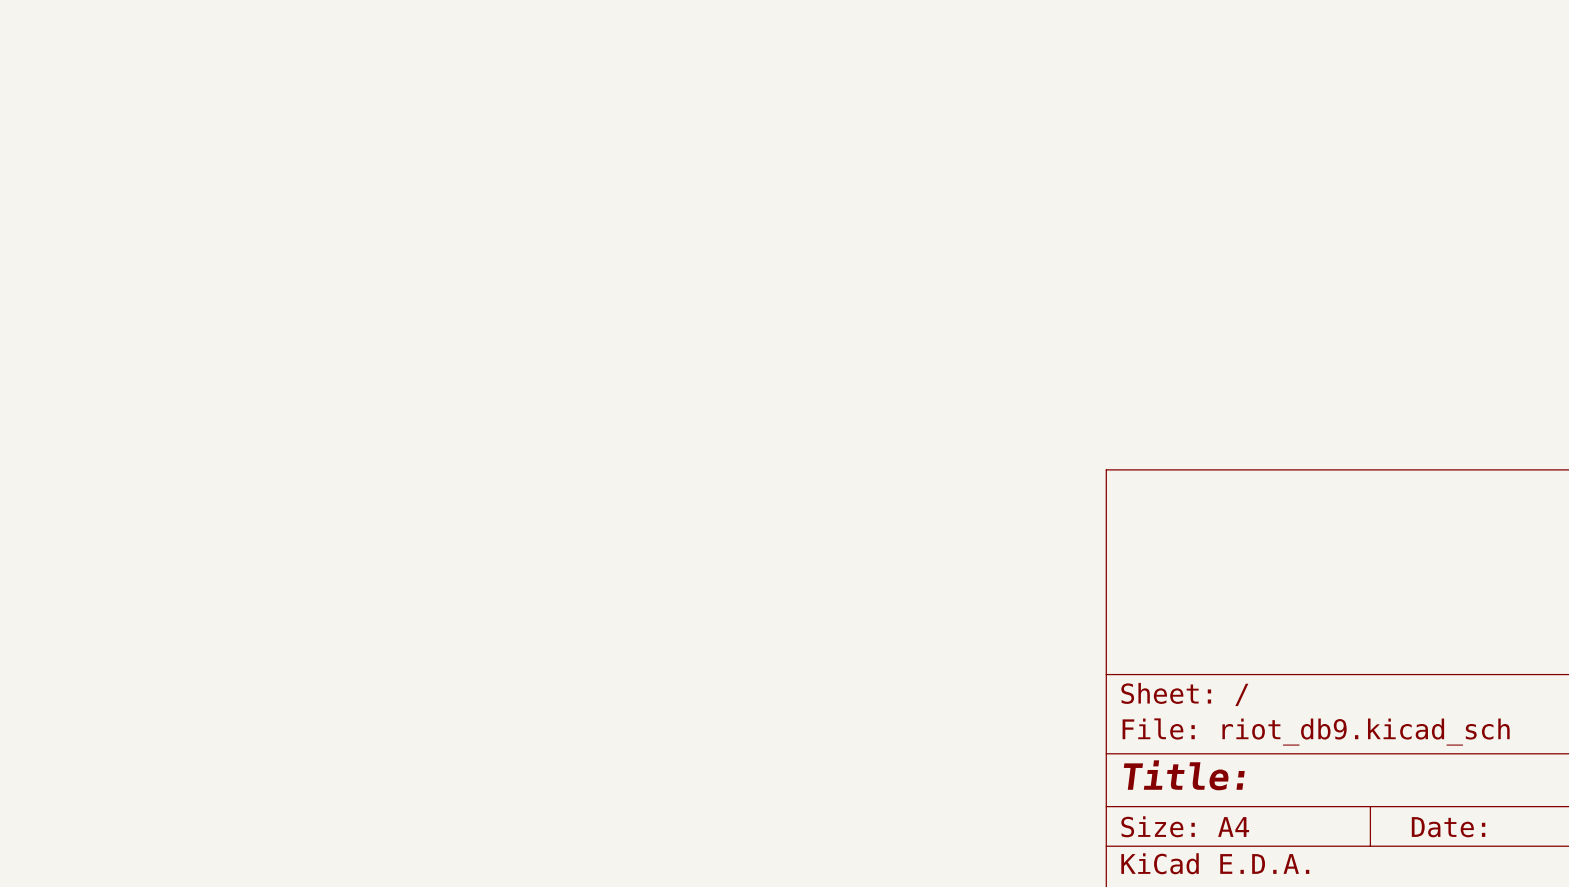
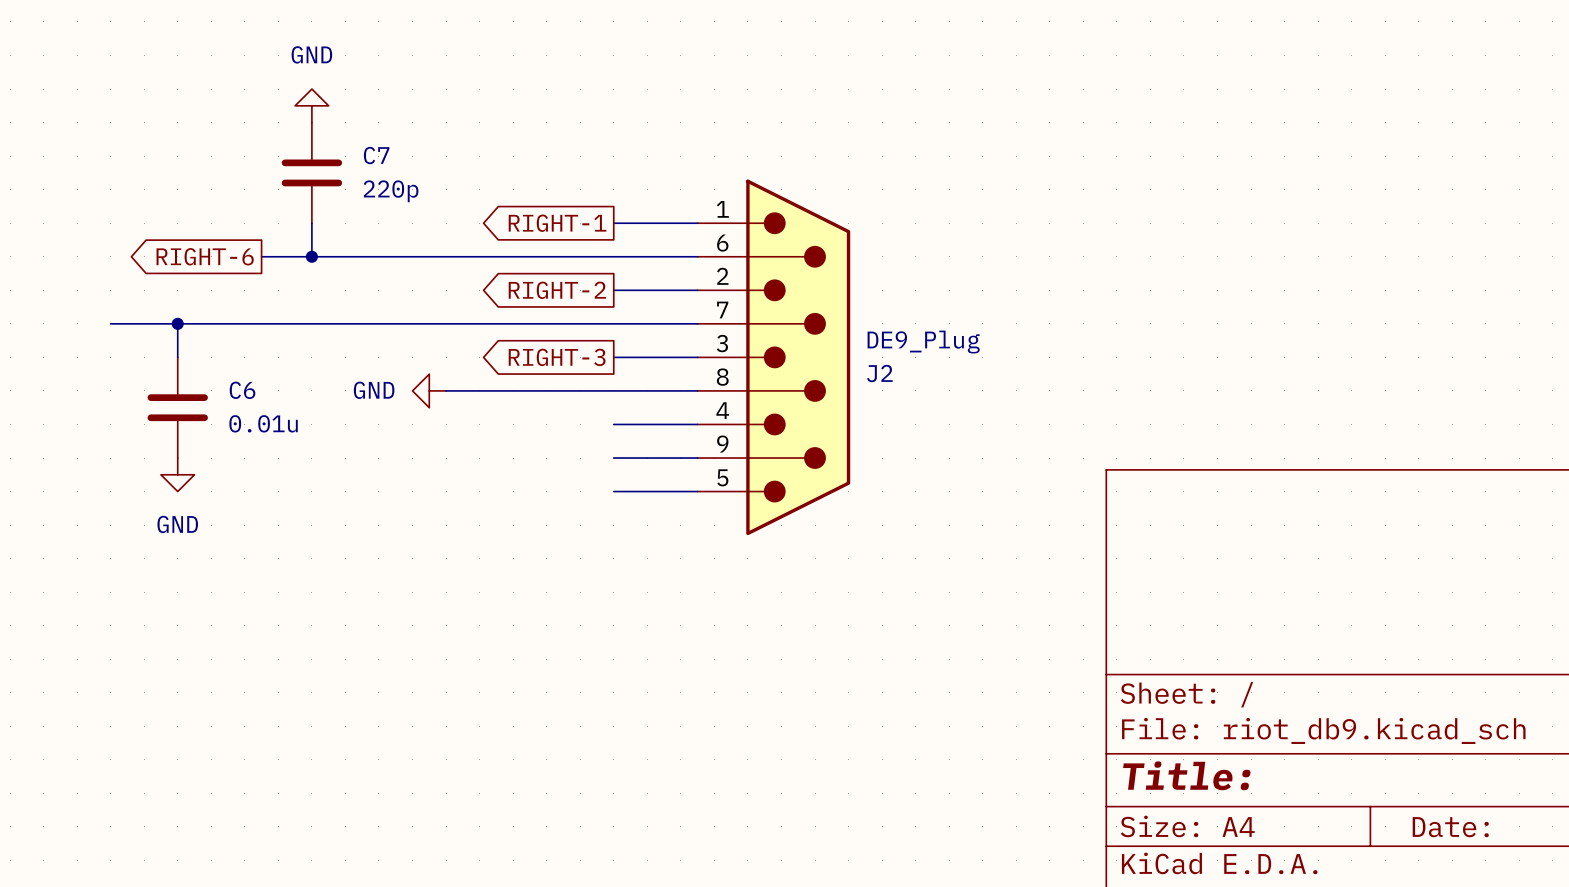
power symbol: none -> GND (311, 105)
C7: none -> 220p (311, 172)
wire: none -> (311, 223) (311, 256)
global label: none -> RIGHT-1 (557, 223)
wire: none -> (613, 223) (697, 223)
global label: none -> RIGHT-6 (205, 256)
wire: none -> (261, 256) (697, 256)
junction: none -> (311, 256)
global label: none -> RIGHT-2 (557, 290)
wire: none -> (613, 290) (697, 290)
wire: none -> (110, 323) (697, 323)
wire: none -> (177, 323) (177, 357)
junction: none -> (177, 323)
global label: none -> RIGHT-3 (557, 357)
wire: none -> (613, 357) (697, 357)
J2: none -> DE9_Plug (773, 357)
power symbol: none -> GND (429, 390)
wire: none -> (446, 390) (697, 390)
C6: none -> 0.01u (177, 407)
wire: none -> (613, 424) (697, 424)
wire: none -> (613, 458) (697, 458)
power symbol: none -> GND (177, 474)
wire: none -> (613, 491) (697, 491)

